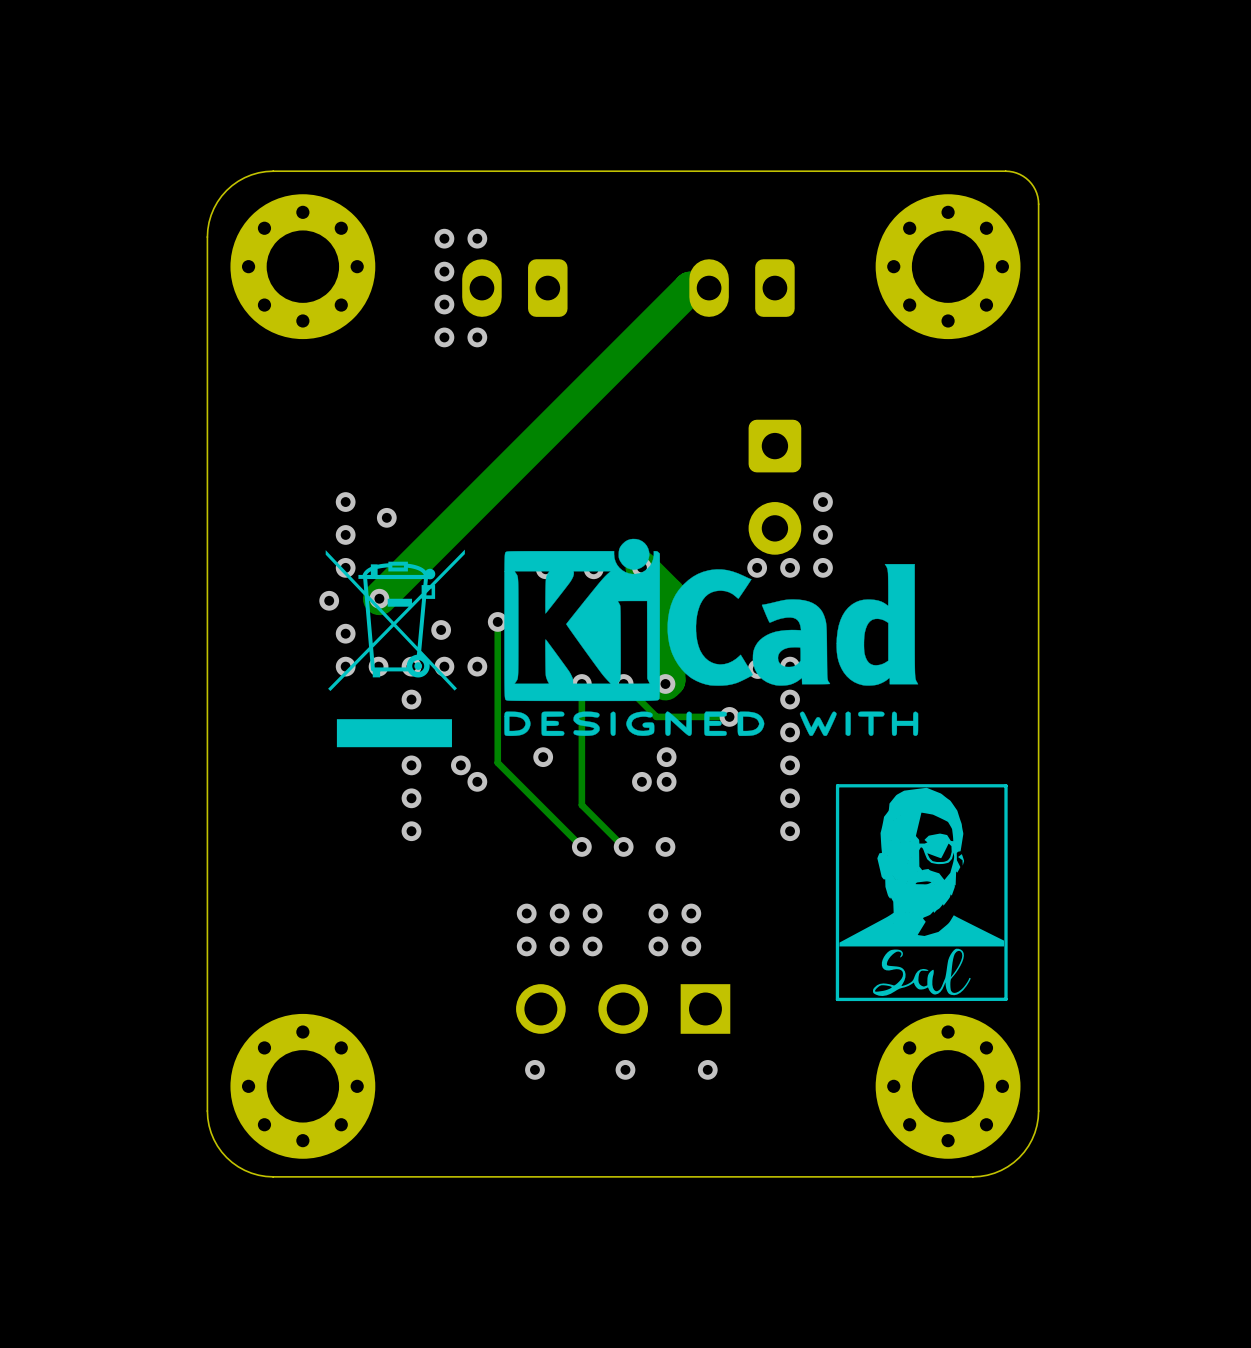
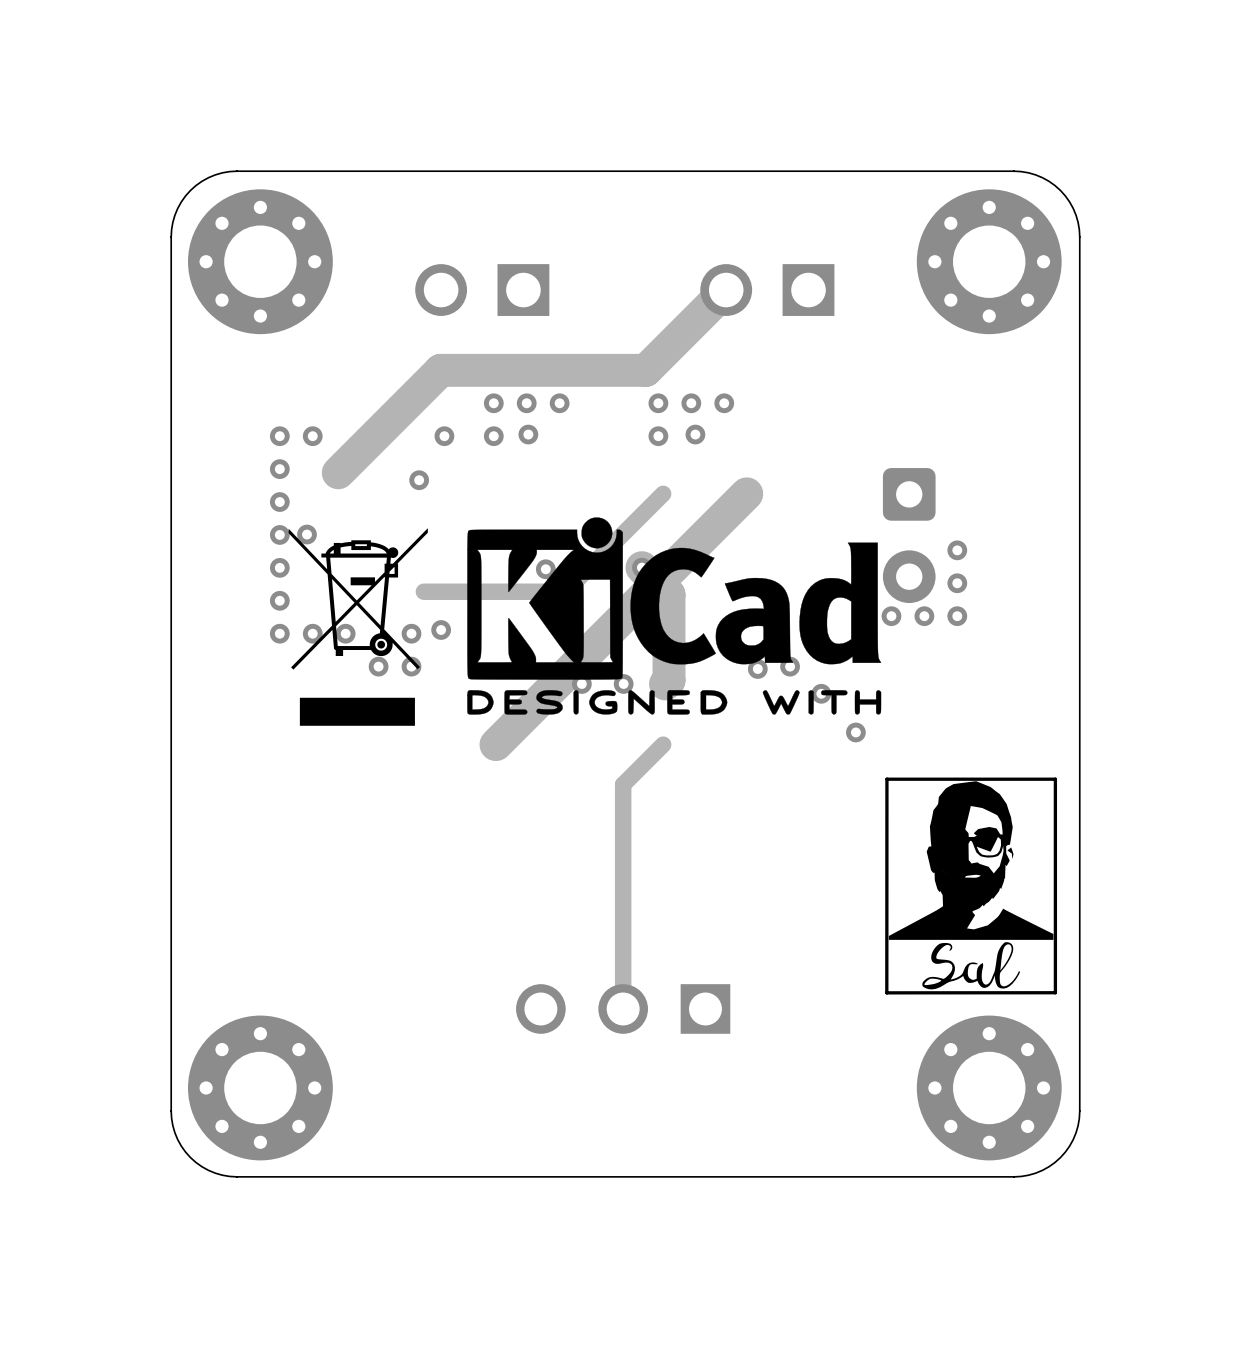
board edge: (273, 171) (251, 174) (238, 181) (226, 190) (213, 208) (209, 222) (207, 237) (207, 1118) (213, 1139) (226, 1157) (244, 1170) (258, 1175) (273, 1176) -> (273, 171) (229, 171) (215, 174) (202, 181) (190, 190) (181, 202) (174, 215) (171, 237) (171, 1118) (174, 1132) (181, 1146) (190, 1157) (202, 1166) (215, 1173) (229, 1176) (273, 1176)
board edge: (1005, 171) (1019, 174) (1028, 180) (1036, 193) (1038, 204) (1038, 1111) (1034, 1132) (1028, 1146) (1019, 1157) (1001, 1170) (987, 1175) (972, 1176) -> (1005, 171) (1035, 174) (1054, 185) (1065, 195) (1073, 208) (1079, 229) (1079, 1111) (1076, 1132) (1069, 1146) (1060, 1157) (1048, 1166) (1035, 1173) (1021, 1176) (972, 1176)
via: (444, 238) -> none
via: (477, 238) -> none
part footprint: [462, 259, 568, 317] -> [415, 264, 550, 316]
part footprint: [689, 259, 795, 317] -> [700, 264, 835, 316]
part position: (302, 266) -> (260, 261)
part position: (948, 266) -> (989, 261)
via: (444, 271) -> none
track: (709, 288) (690, 288) (379, 598) -> none
track: none -> (726, 290) (645, 370) (440, 370) (338, 472)
via: (444, 304) -> none
via: (444, 337) -> none
via: (477, 337) -> none
via: none -> (493, 403)
via: none -> (526, 403)
via: none -> (559, 403)
via: none -> (658, 403)
via: none -> (691, 403)
via: none -> (724, 403)
via: none -> (528, 434)
via: none -> (695, 434)
via: none -> (279, 436)
via: none -> (312, 436)
via: none -> (444, 436)
via: none -> (493, 436)
via: none -> (658, 436)
via: none -> (279, 469)
via: none -> (419, 480)
part position: (774, 487) -> (909, 535)
track: none -> (663, 493) (565, 591) (423, 591)
track: none -> (746, 493) (495, 744)
via: none -> (279, 502)
via: (345, 502) -> none
via: (822, 502) -> none
via: (386, 517) -> none
via: none -> (279, 534)
via: none -> (306, 534)
via: (345, 534) -> none
via: (822, 534) -> none
via: none -> (957, 550)
via: none -> (279, 567)
via: (345, 567) -> none
via: (757, 567) -> none
via: (790, 567) -> none
via: (822, 567) -> none
via: none -> (957, 583)
via: (379, 598) -> none
via: none -> (279, 600)
via: (329, 600) -> none
via: none -> (891, 616)
via: none -> (924, 616)
via: none -> (957, 616)
track: (497, 621) (497, 762) (581, 846) -> none
via: (497, 621) -> none
via: none -> (279, 633)
via: none -> (312, 633)
via: none -> (411, 633)
drawing position: (711, 637) -> (674, 616)
drawing position: (395, 648) -> (358, 626)
via: (345, 666) -> none
via: (444, 666) -> none
via: (477, 666) -> none
track: (581, 683) (581, 805) (623, 846) -> none
track: (623, 683) (656, 716) (729, 716) -> none
via: (665, 683) -> none
via: none -> (821, 693)
via: (411, 699) -> none
via: (790, 699) -> none
via: (729, 716) -> none
via: (790, 732) -> none
via: none -> (855, 732)
track: none -> (663, 744) (623, 784) (623, 1008)
via: (543, 757) -> none
via: (666, 757) -> none
via: (411, 765) -> none
via: (460, 765) -> none
via: (790, 765) -> none
via: (477, 781) -> none
via: (641, 781) -> none
via: (666, 781) -> none
line: (1006, 785) (1006, 999) (837, 999) (837, 785) (1006, 785) -> (1055, 779) (1055, 992) (886, 992) (886, 779) (1055, 779)
via: (411, 798) -> none
via: (790, 798) -> none
via: (411, 831) -> none
via: (790, 831) -> none
via: (581, 846) -> none
via: (623, 846) -> none
via: (665, 846) -> none
drawing position: (921, 867) -> (971, 860)
via: (526, 913) -> none
via: (559, 913) -> none
via: (592, 913) -> none
via: (658, 913) -> none
via: (691, 913) -> none
via: (526, 946) -> none
via: (559, 946) -> none
via: (592, 946) -> none
via: (658, 946) -> none
via: (691, 946) -> none
drawing position: (921, 972) -> (971, 965)
via: (534, 1069) -> none
via: (625, 1069) -> none
via: (707, 1069) -> none
part position: (302, 1086) -> (260, 1087)
part position: (948, 1086) -> (989, 1087)

